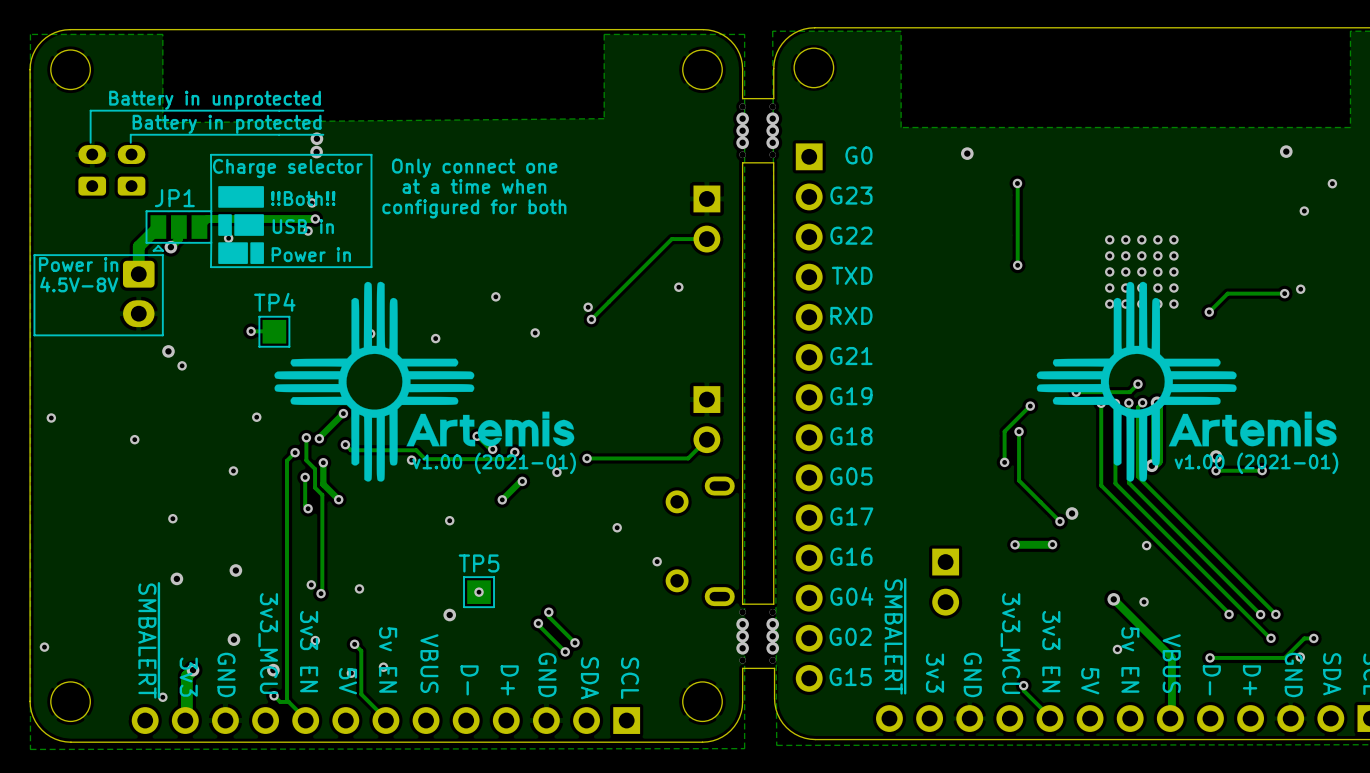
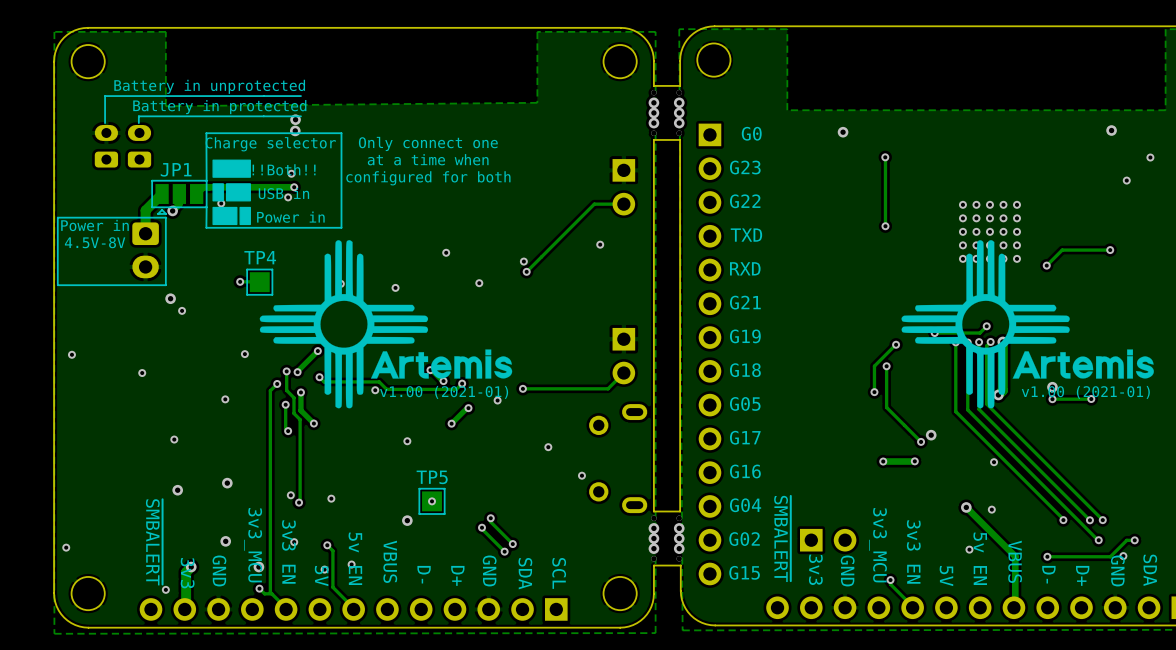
via: (1300, 289) -> none
part rotation: 0° (945, 582) -> 90° counterclockwise (828, 540)
part position: (945, 582) -> (828, 540)

